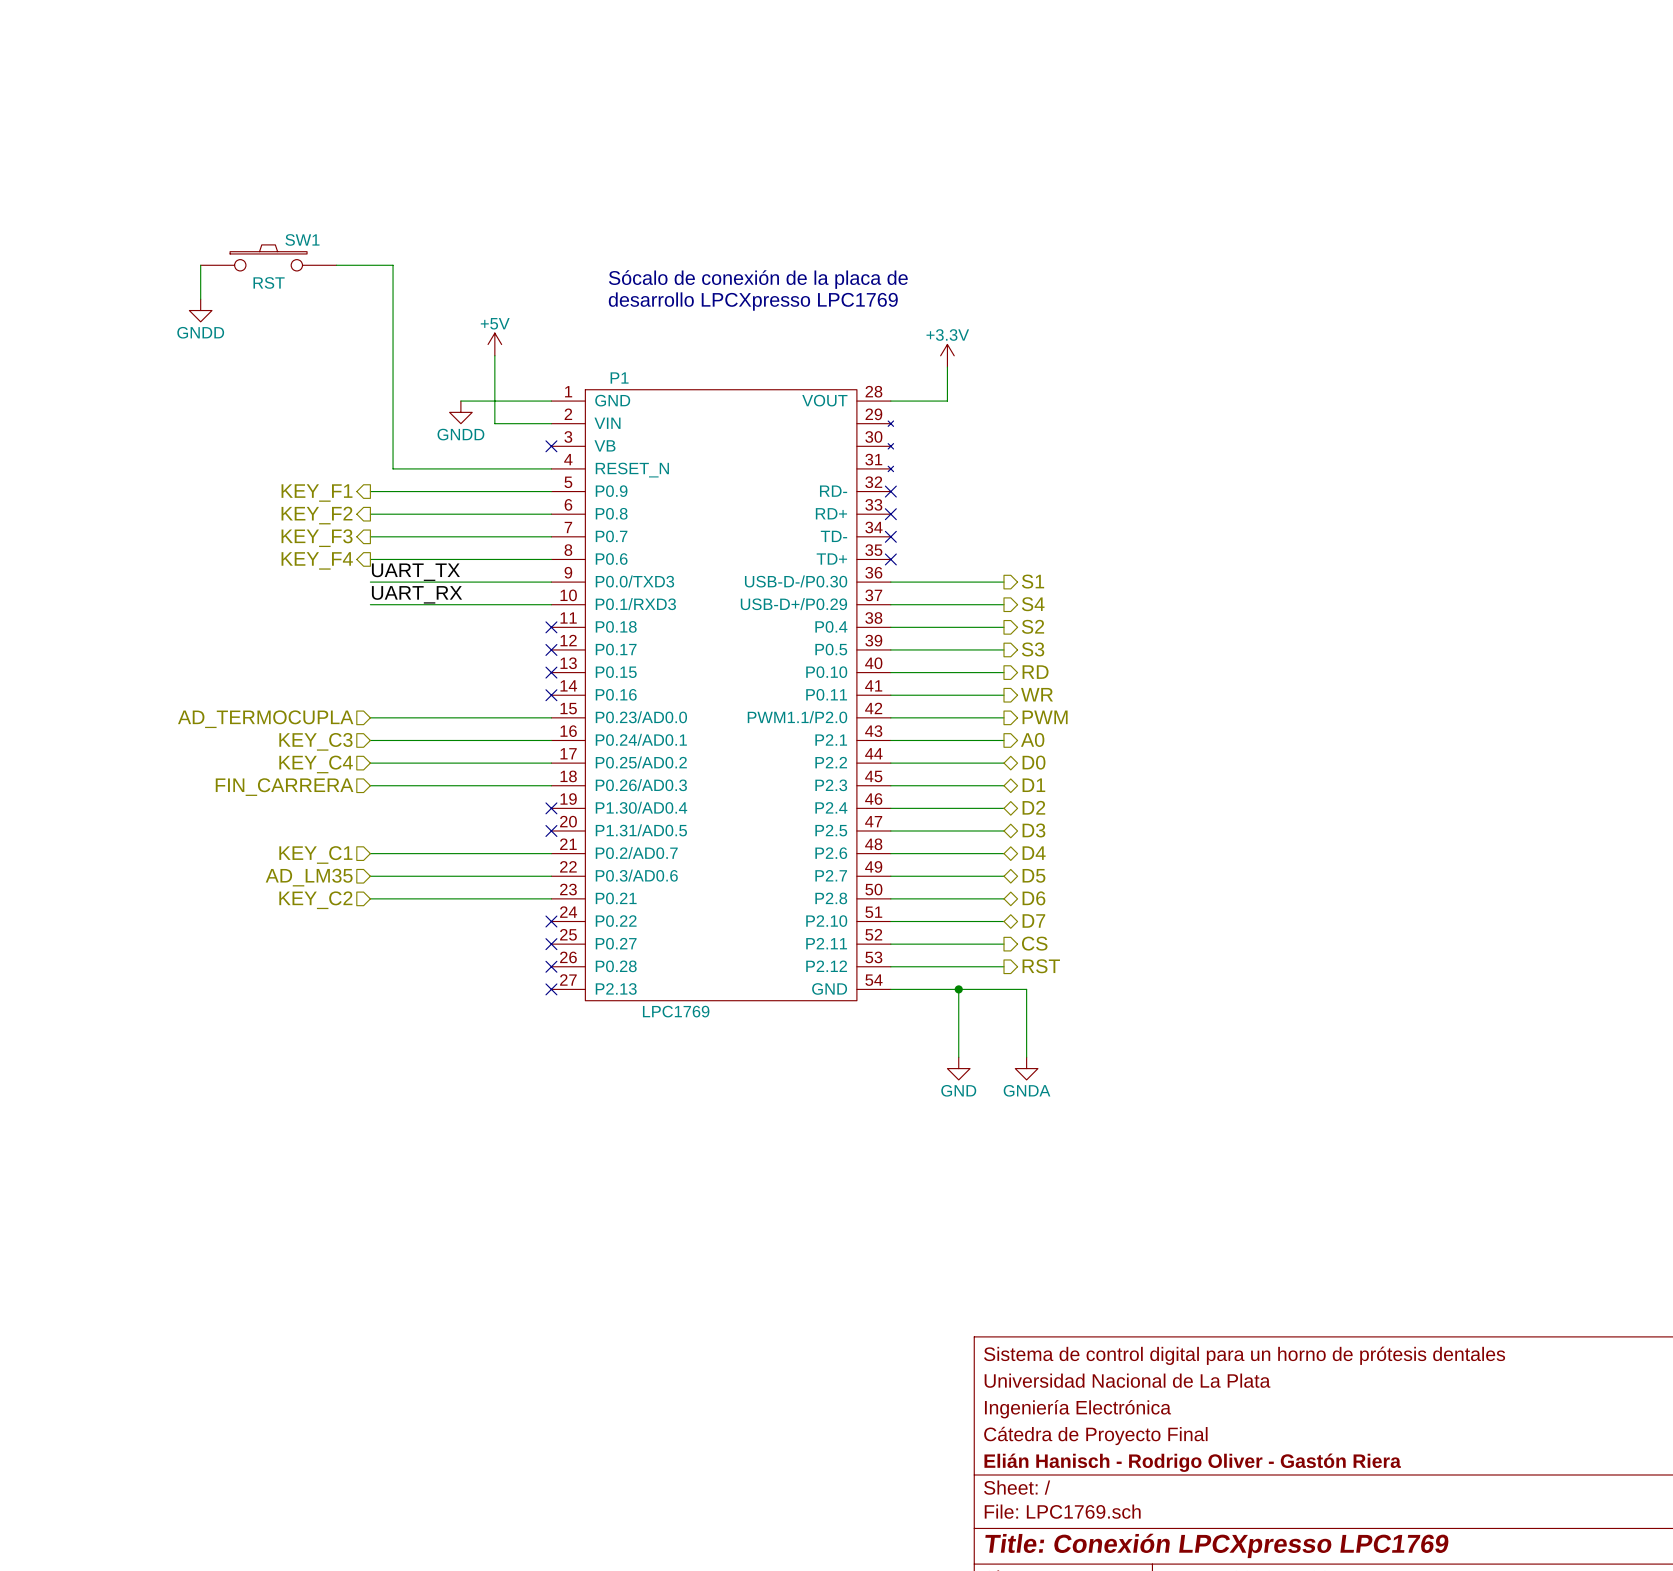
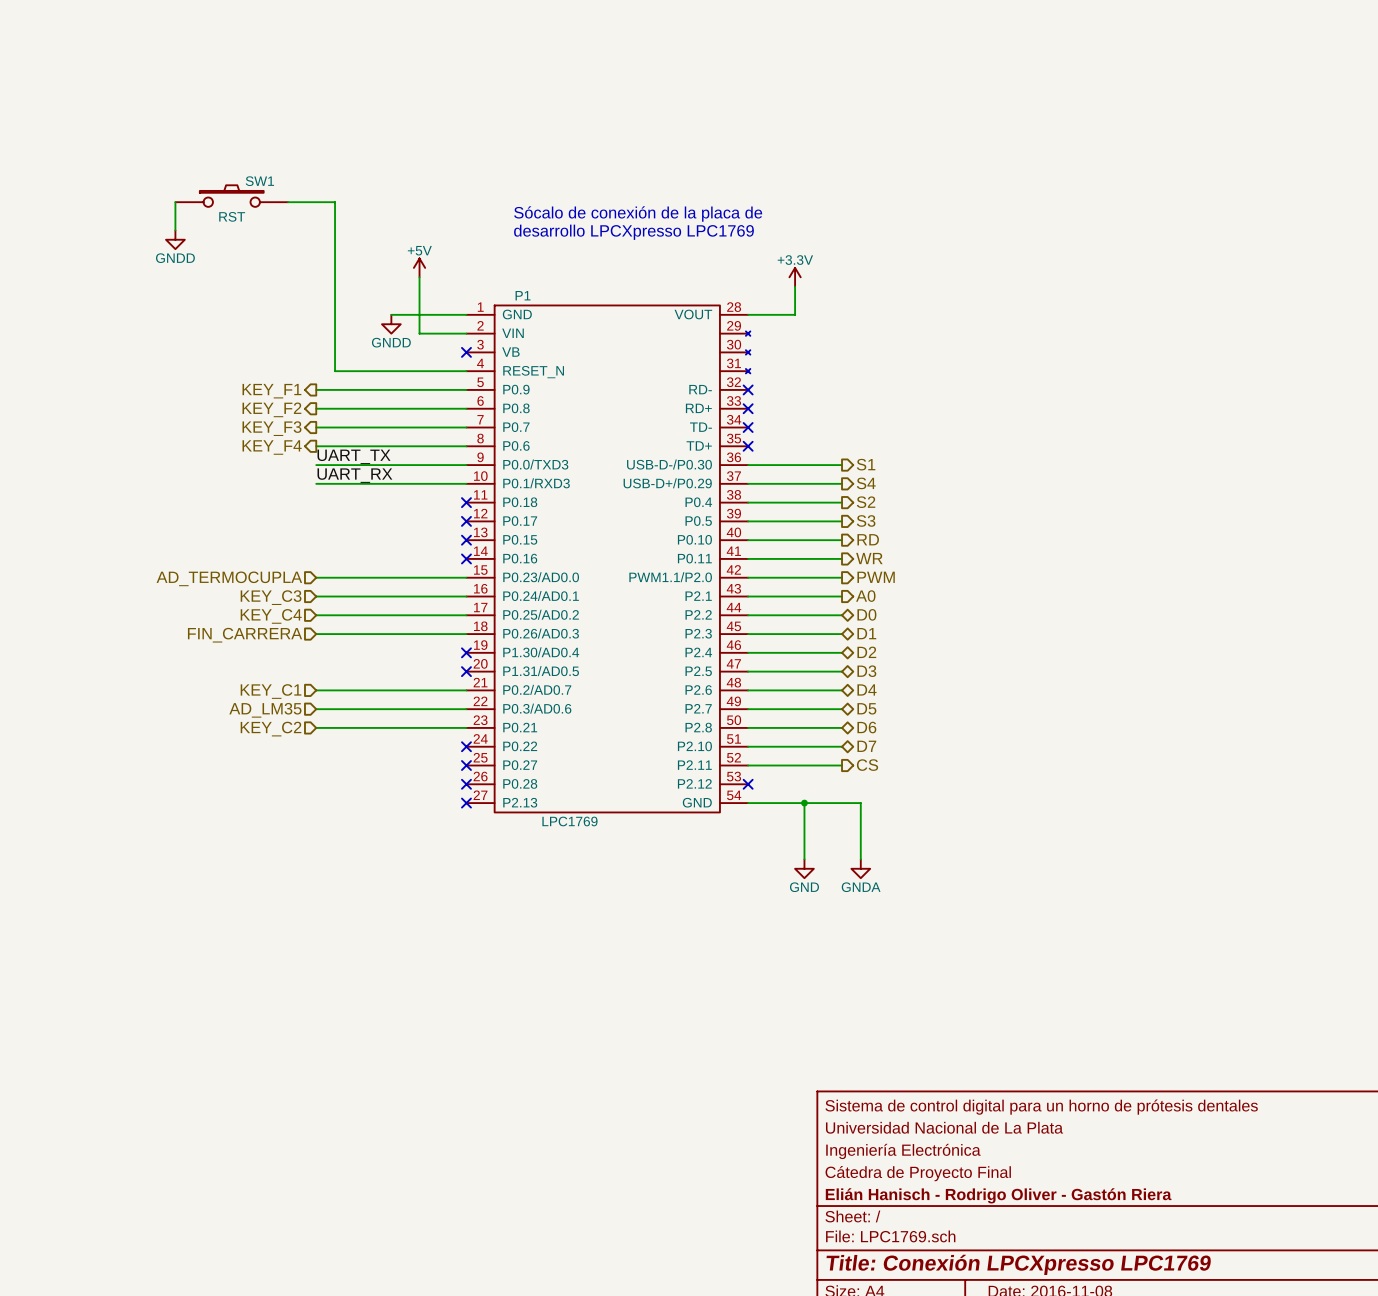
wire: (890, 966) (1003, 966) -> none
no-connect mark: none -> (748, 784)
hierarchical label: RST (1041, 966) -> none

